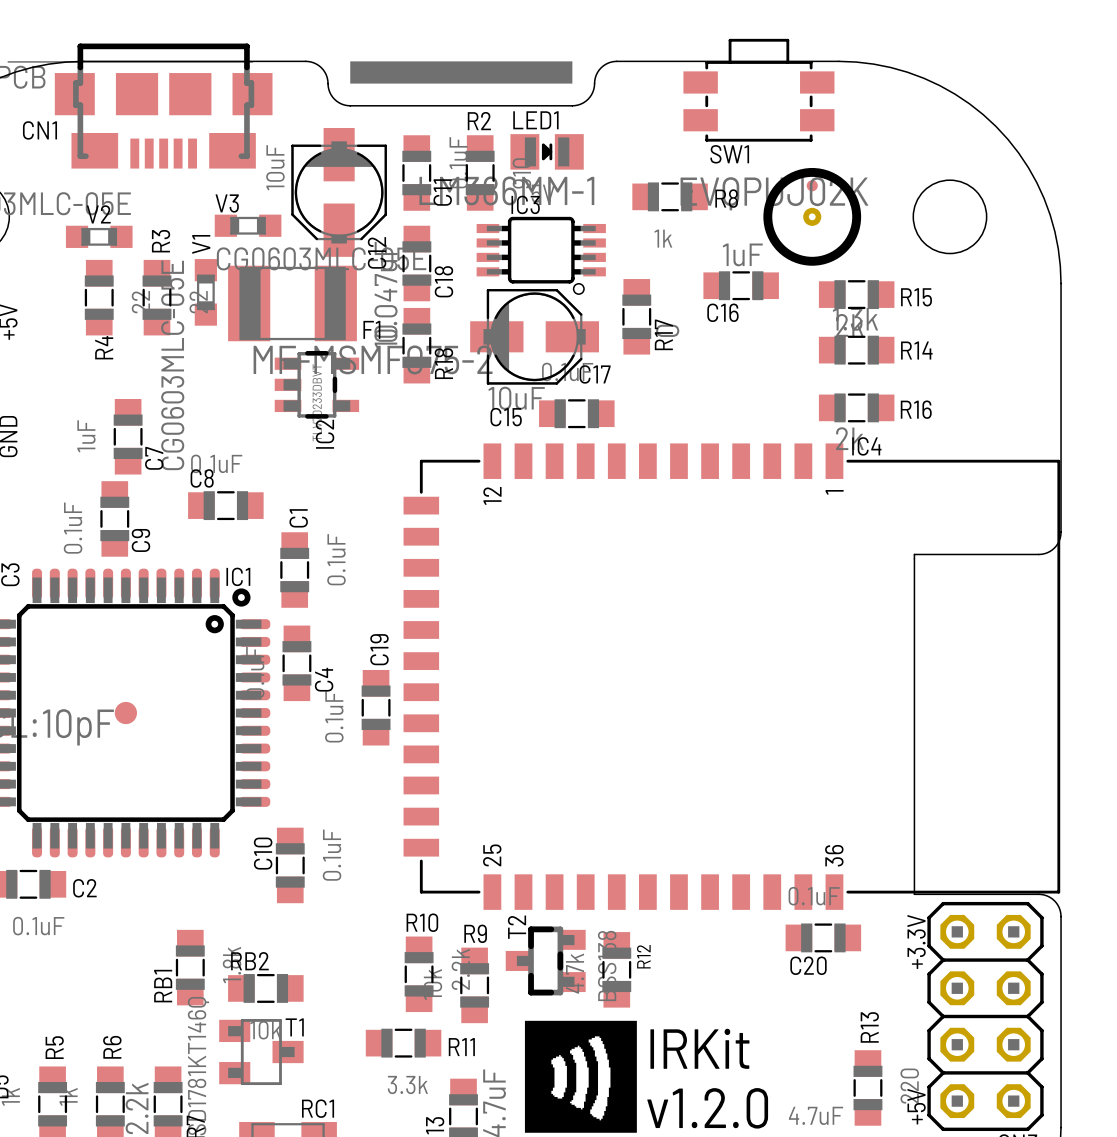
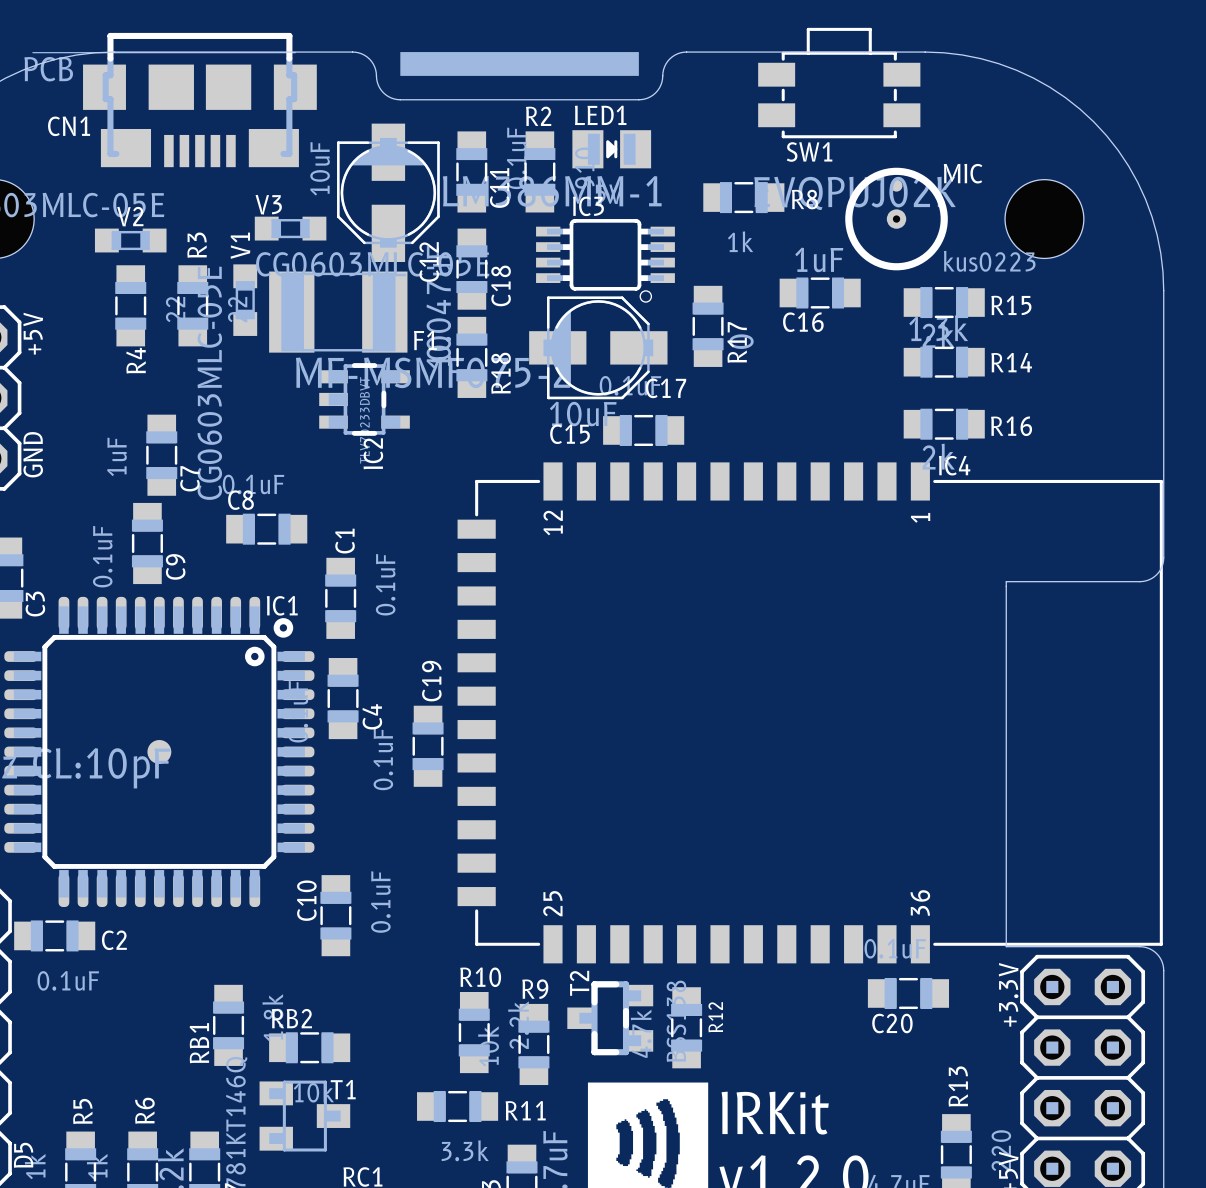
part: (812, 216) -> none
MIC: none -> kus0223 (896, 219)

